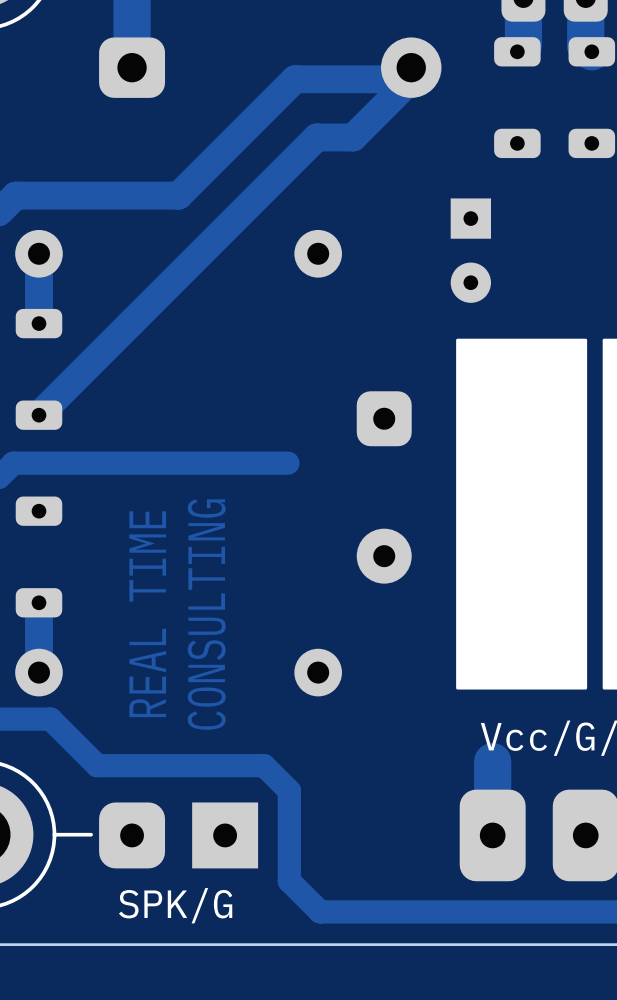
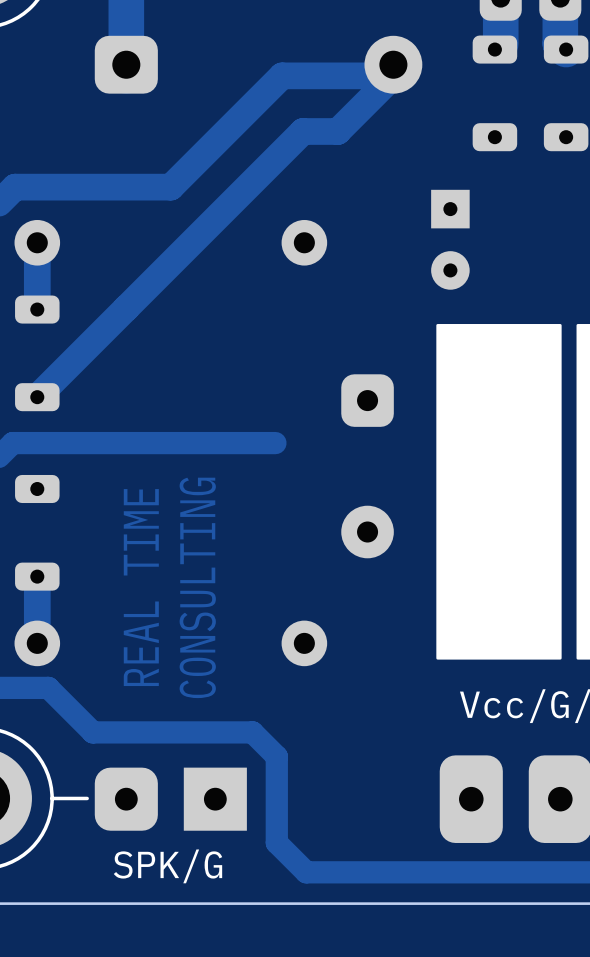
track: (492, 761) (492, 835) -> none

